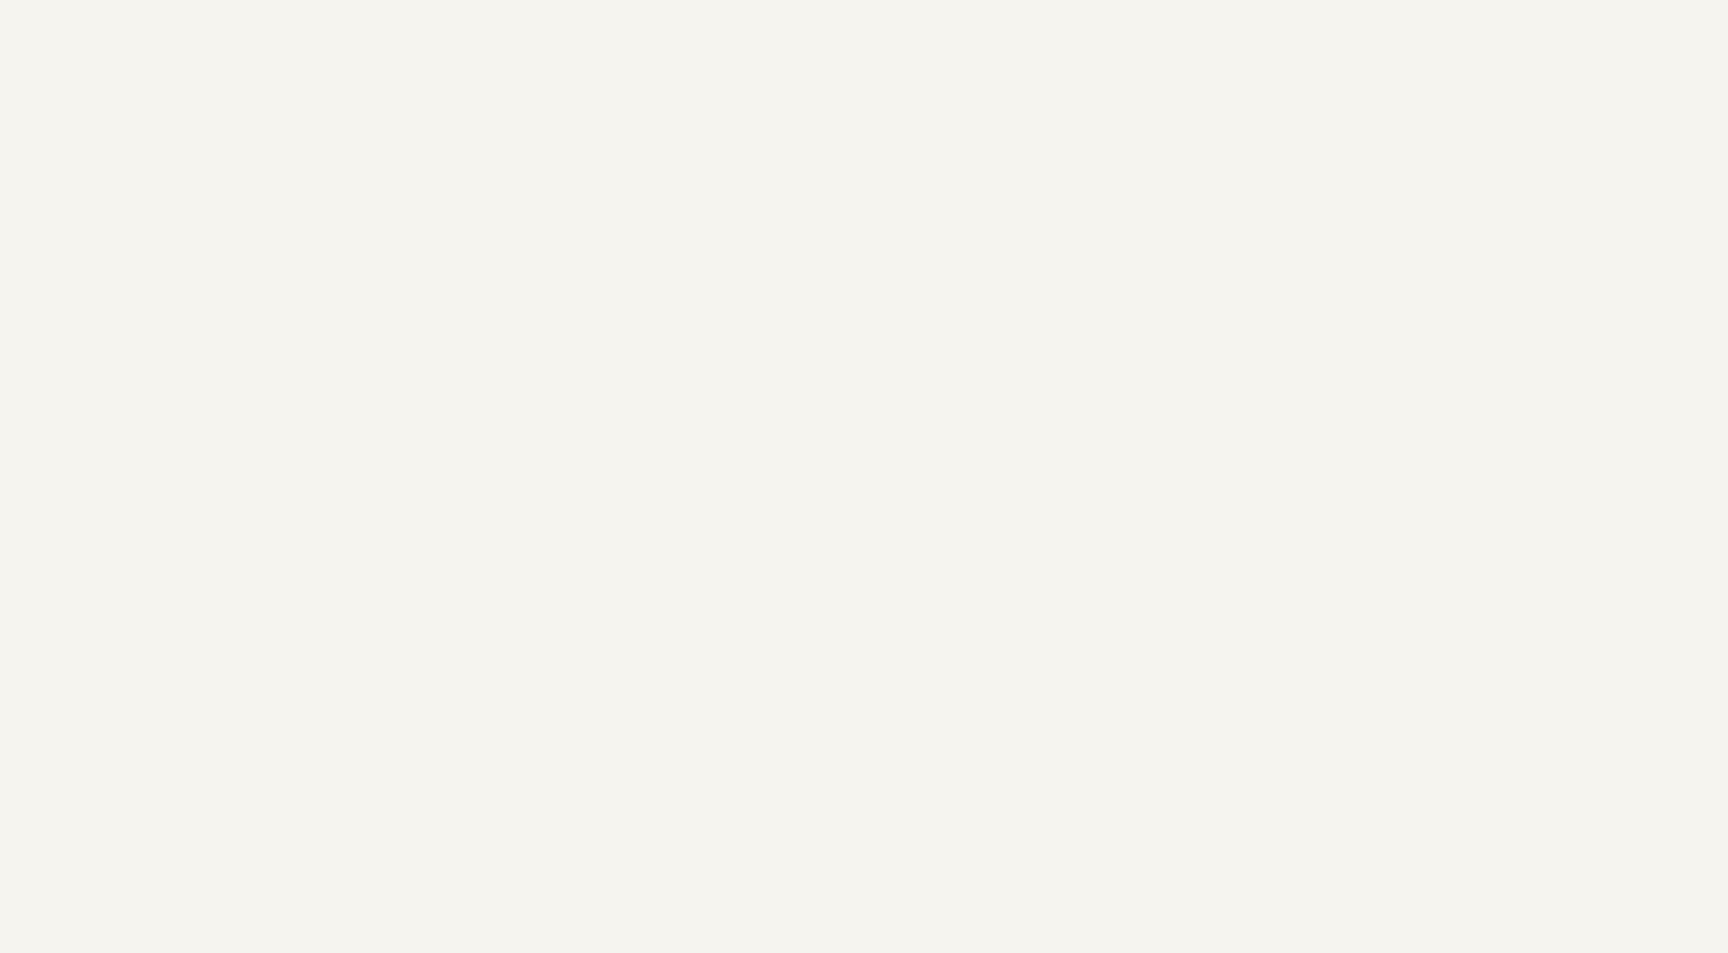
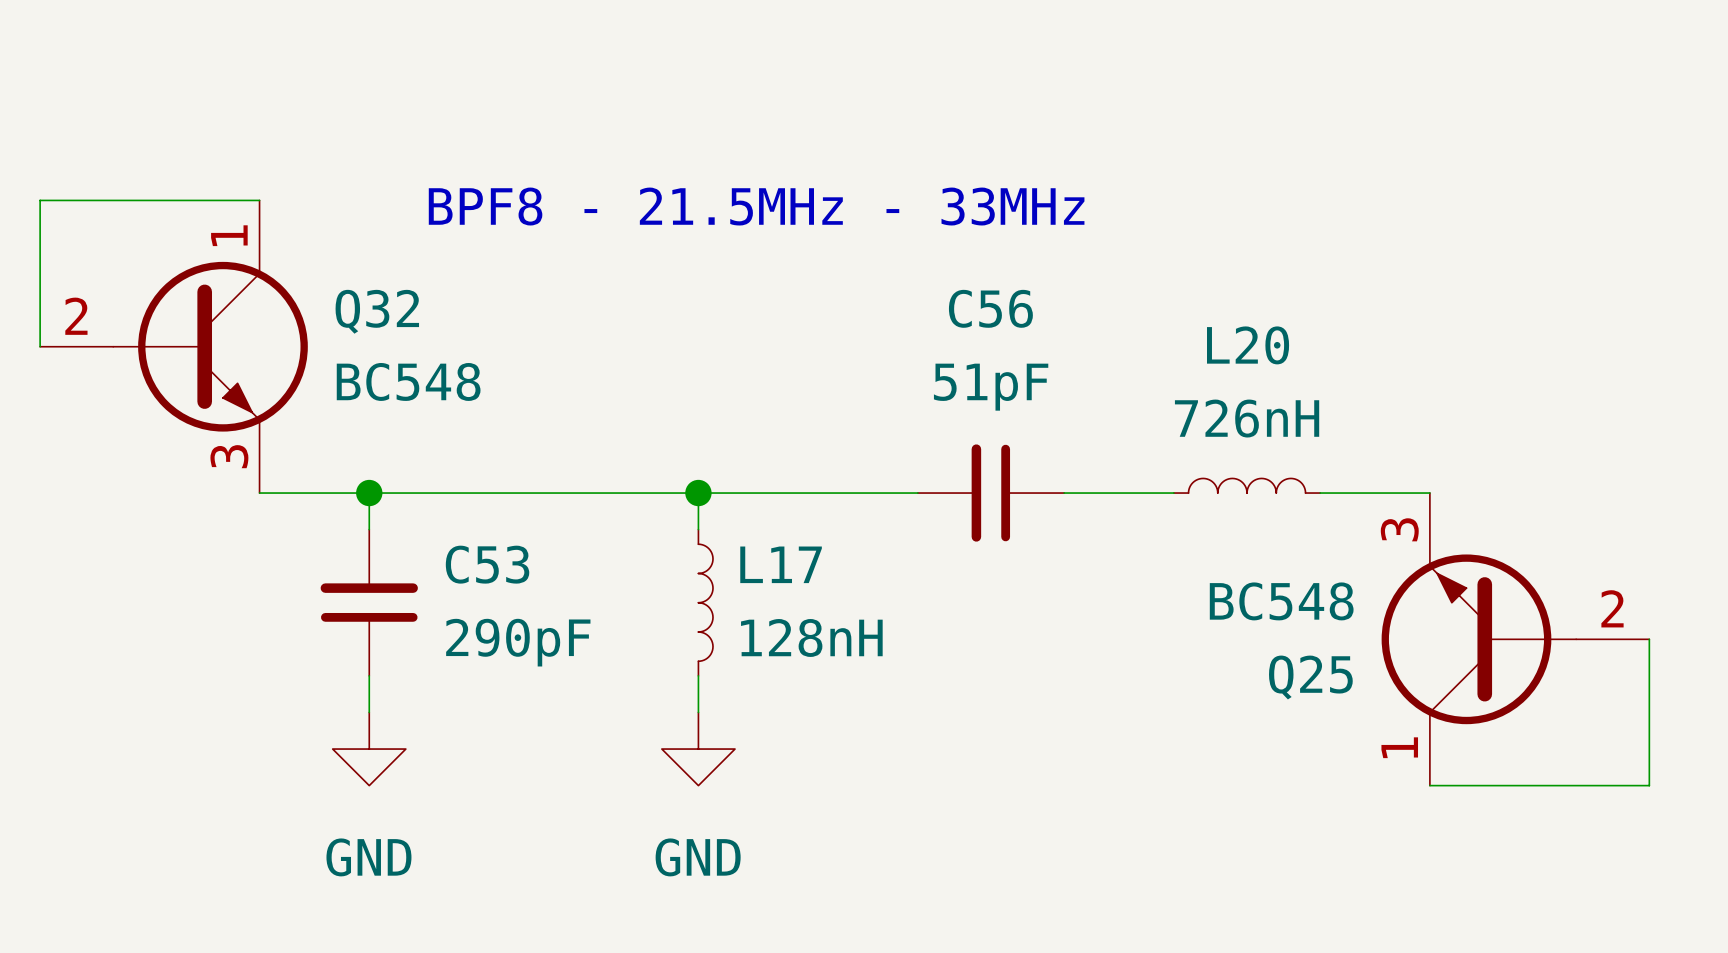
wire: none -> (259, 200) (40, 200) (40, 346)
text: none -> BPF8 - 21.5MHz - 33MHz (756, 206)
Q32: none -> BC548 (173, 346)
L20: none -> 726nH (1247, 485)
wire: none -> (259, 493) (917, 493)
wire: none -> (369, 493) (369, 529)
junction: none -> (369, 493)
wire: none -> (698, 493) (698, 529)
junction: none -> (698, 493)
C56: none -> 51pF (991, 493)
wire: none -> (1064, 493) (1173, 493)
wire: none -> (1320, 493) (1429, 493)
C53: none -> 290pF (369, 602)
L17: none -> 128nH (705, 602)
Q25: none -> BC548 (1515, 639)
wire: none -> (1649, 639) (1649, 785) (1429, 785)
wire: none -> (369, 675) (369, 712)
wire: none -> (698, 675) (698, 712)
power symbol: none -> GND (369, 749)
power symbol: none -> GND (698, 749)

